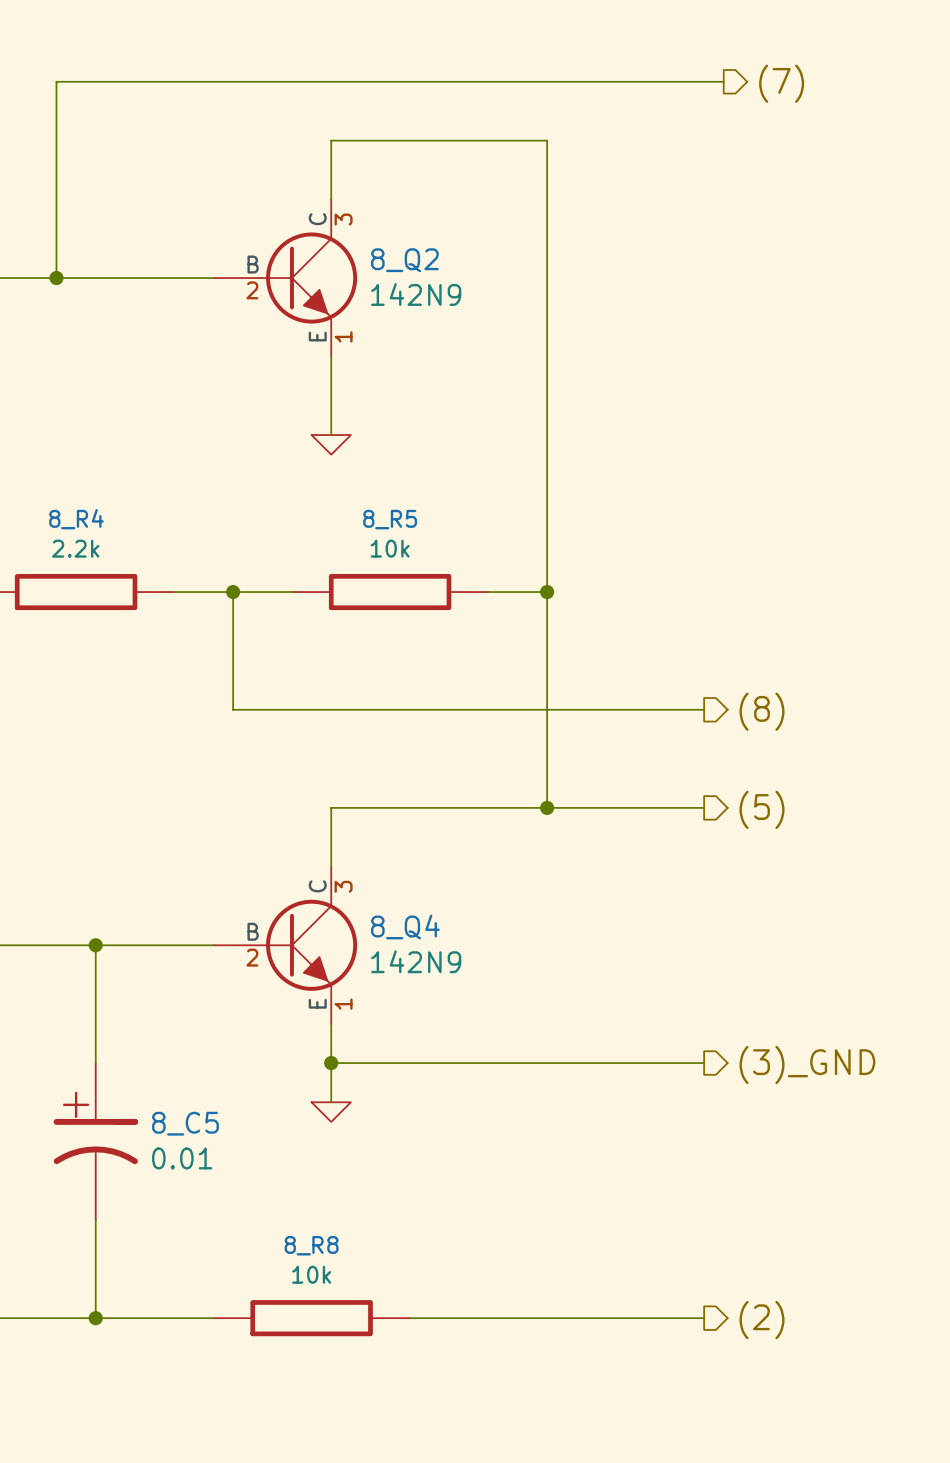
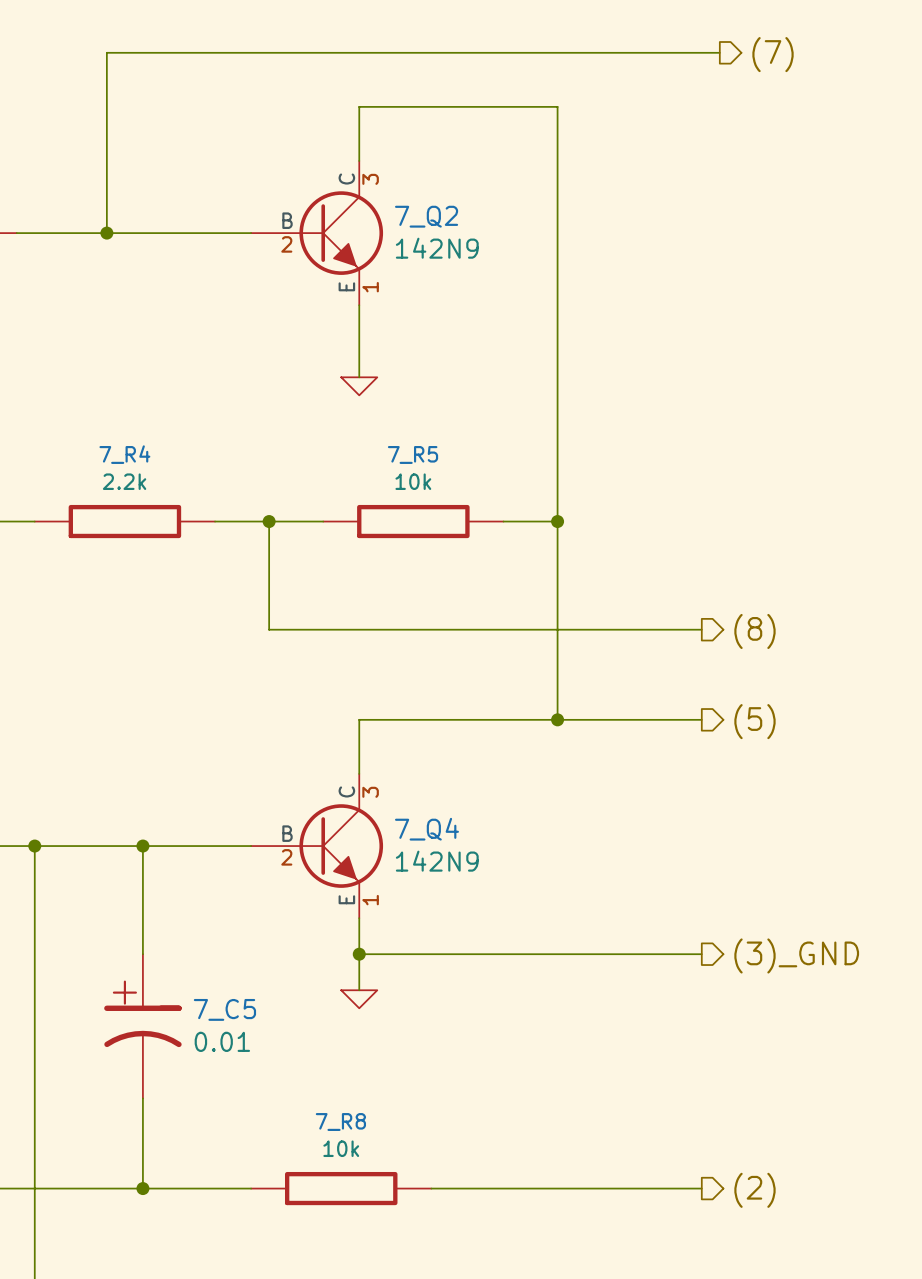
8_Q2 name: 8_Q2 (404, 260) -> 7_Q2 (426, 216)
8_R4 name: 8_R4 (76, 519) -> 7_R4 (124, 454)
8_R5 name: 8_R5 (390, 519) -> 7_R5 (413, 454)
8_Q4 name: 8_Q4 (405, 926) -> 7_Q4 (426, 829)
8_C5 name: 8_C5 (185, 1123) -> 7_C5 (224, 1009)
8_R8 name: 8_R8 (311, 1245) -> 7_R8 (340, 1122)

